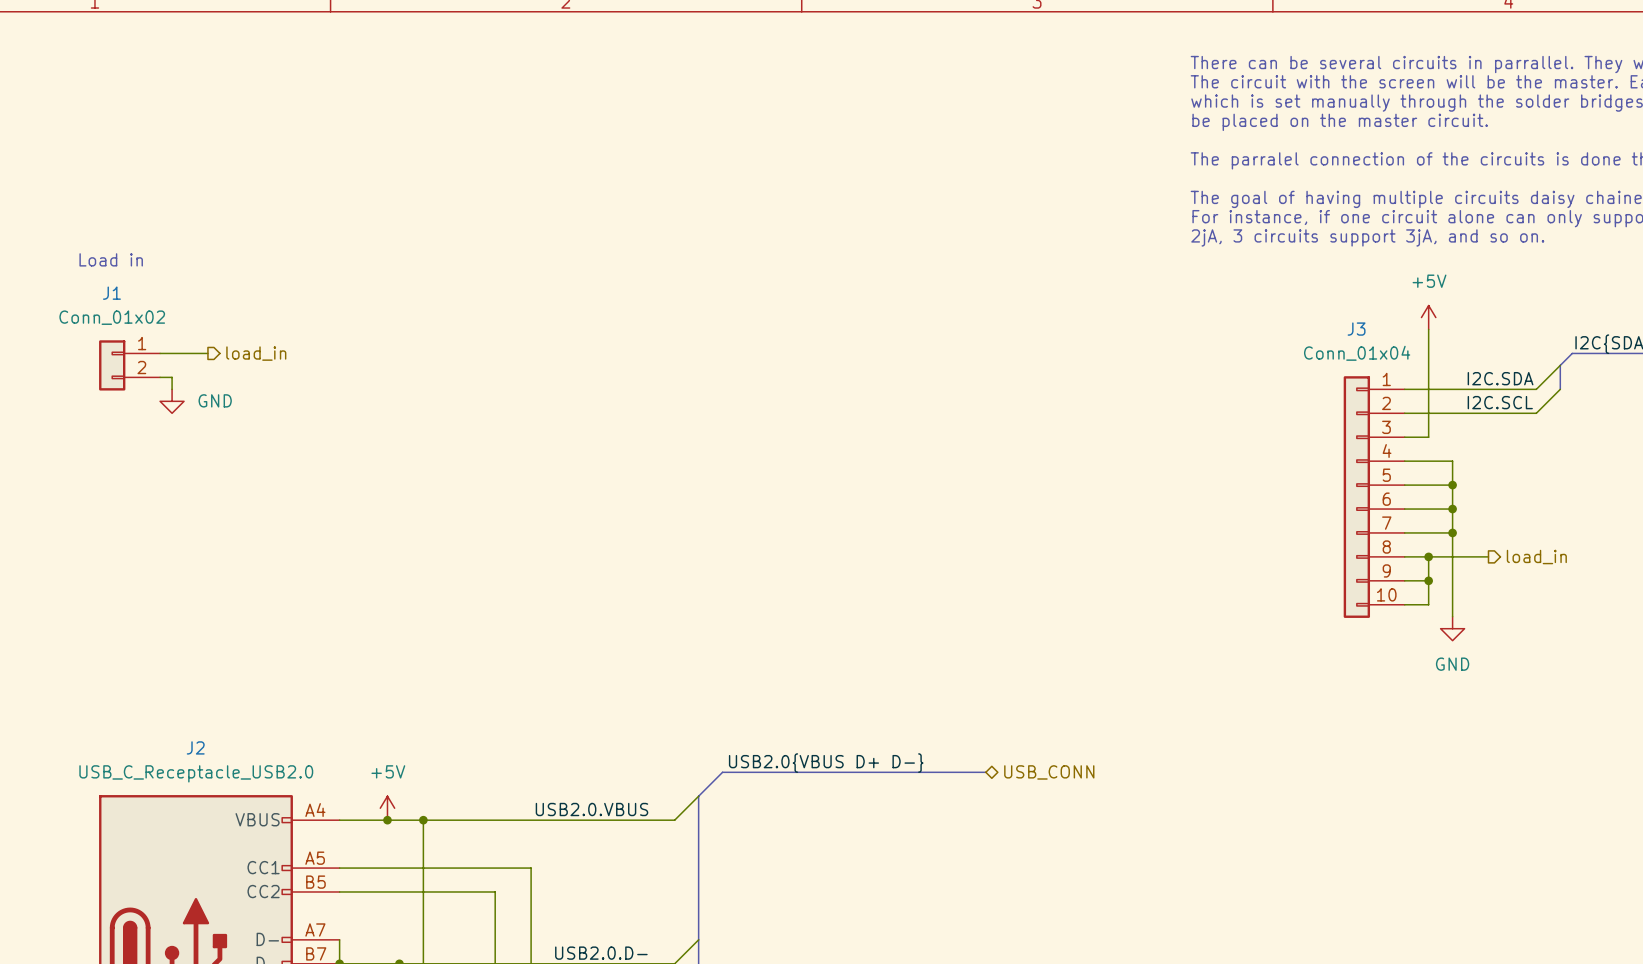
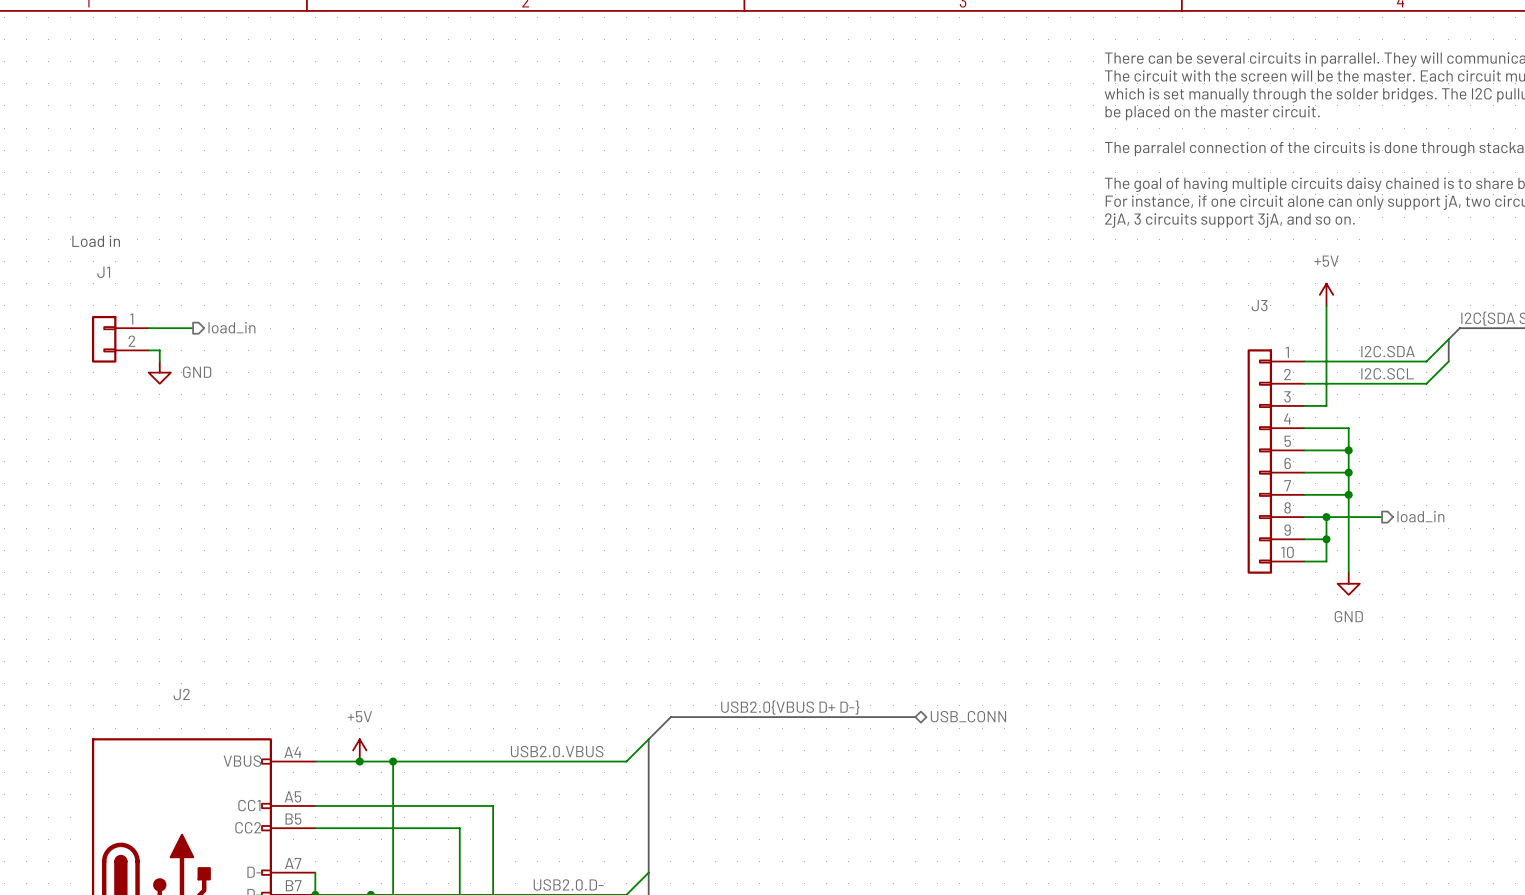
J1 value: Conn_01x02 (112, 317) -> none
J3 value: Conn_01x04 (1357, 353) -> none
J2 value: USB_C_Receptacle_USB2.0 (196, 773) -> none

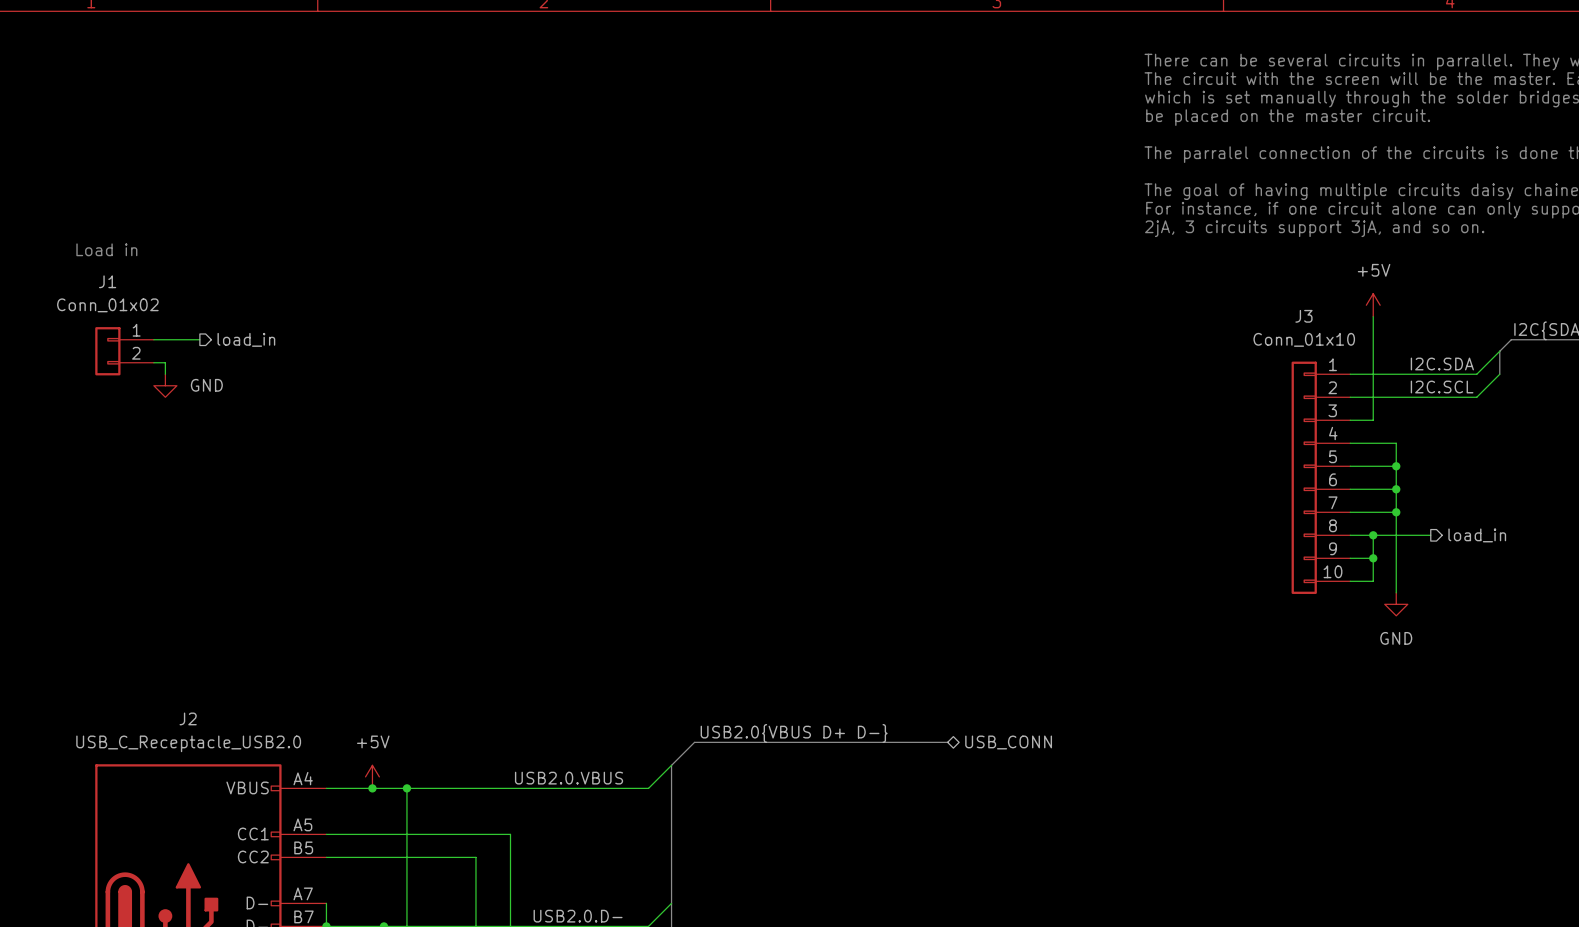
J1 value: none -> Conn_01x02 (107, 305)
J3 value: none -> Conn_01x10 (1304, 339)
J2 value: none -> USB_C_Receptacle_USB2.0 (188, 743)

